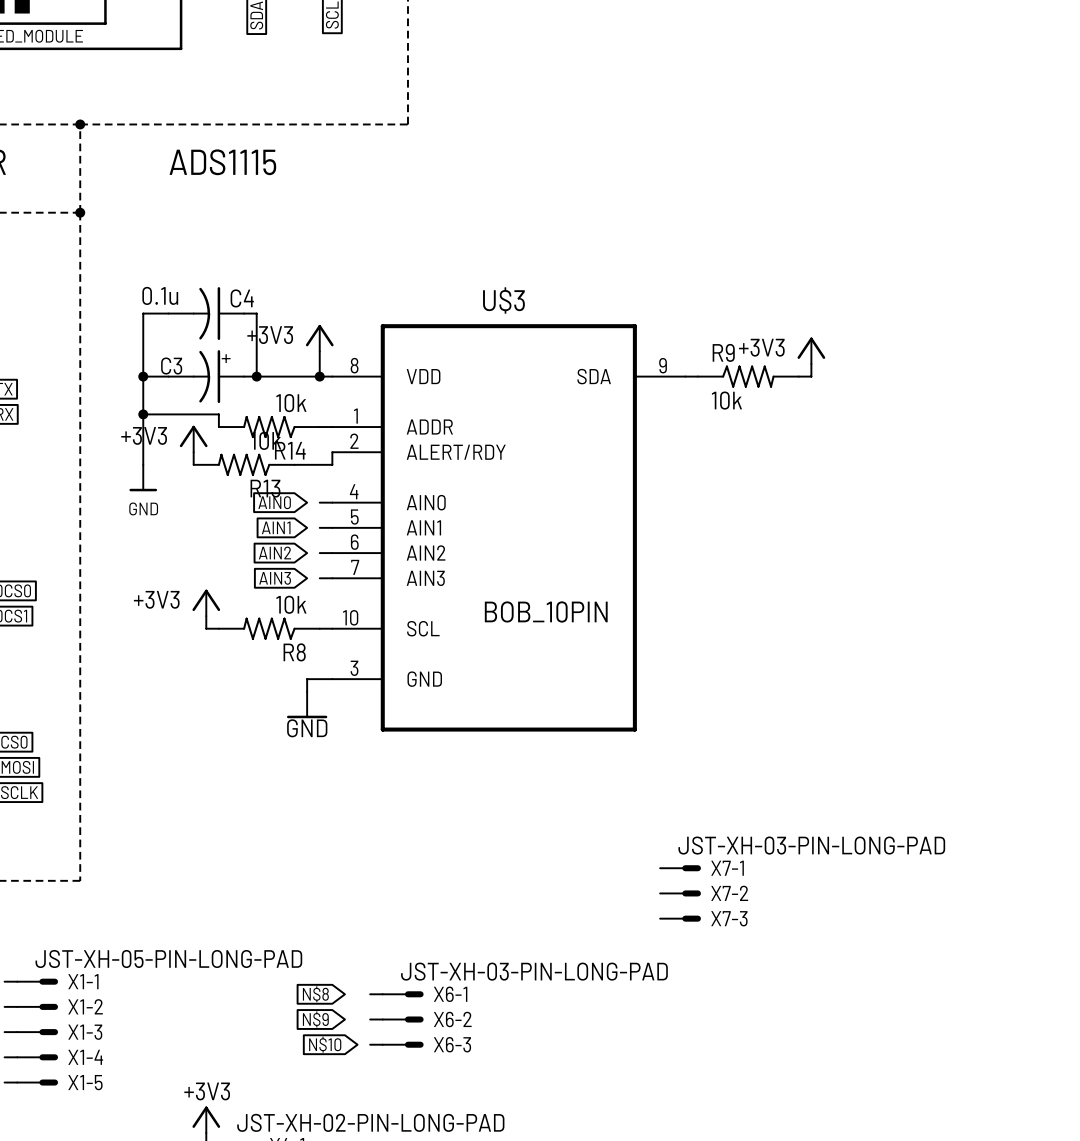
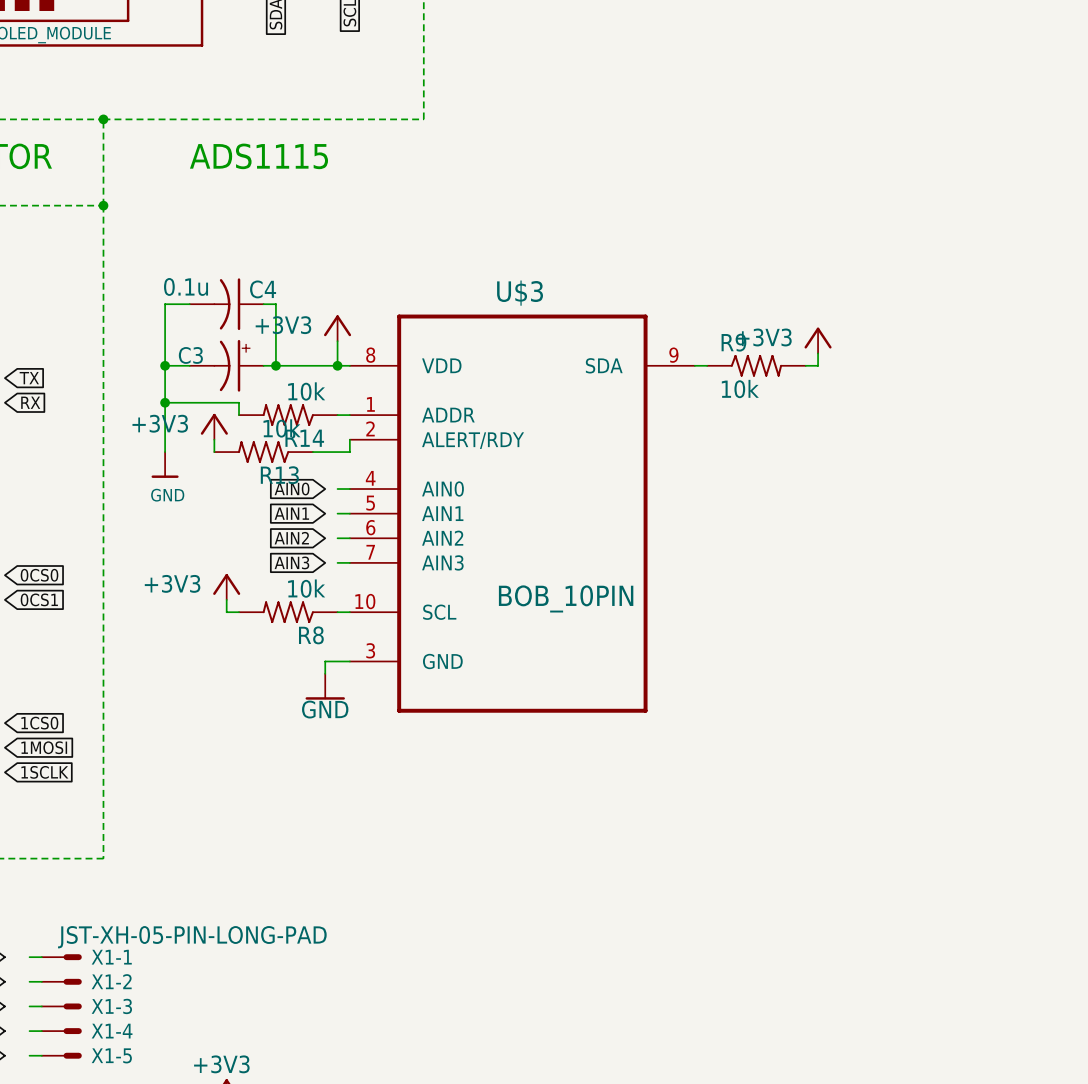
X7-1: JST-XH-03-PIN-LONG-PAD (680, 868) -> none
X7-2: (680, 893) -> none
X7-3: (680, 918) -> none
global label: N$8 (315, 994) -> none
wire: (370, 994) (382, 994) -> none
X6-1: JST-XH-03-PIN-LONG-PAD (403, 994) -> none
global label: N$9 (315, 1019) -> none
wire: (370, 1019) (382, 1019) -> none
X6-2: (403, 1019) -> none
global label: N$10 (325, 1044) -> none
wire: (370, 1044) (382, 1044) -> none
X6-3: (403, 1044) -> none

